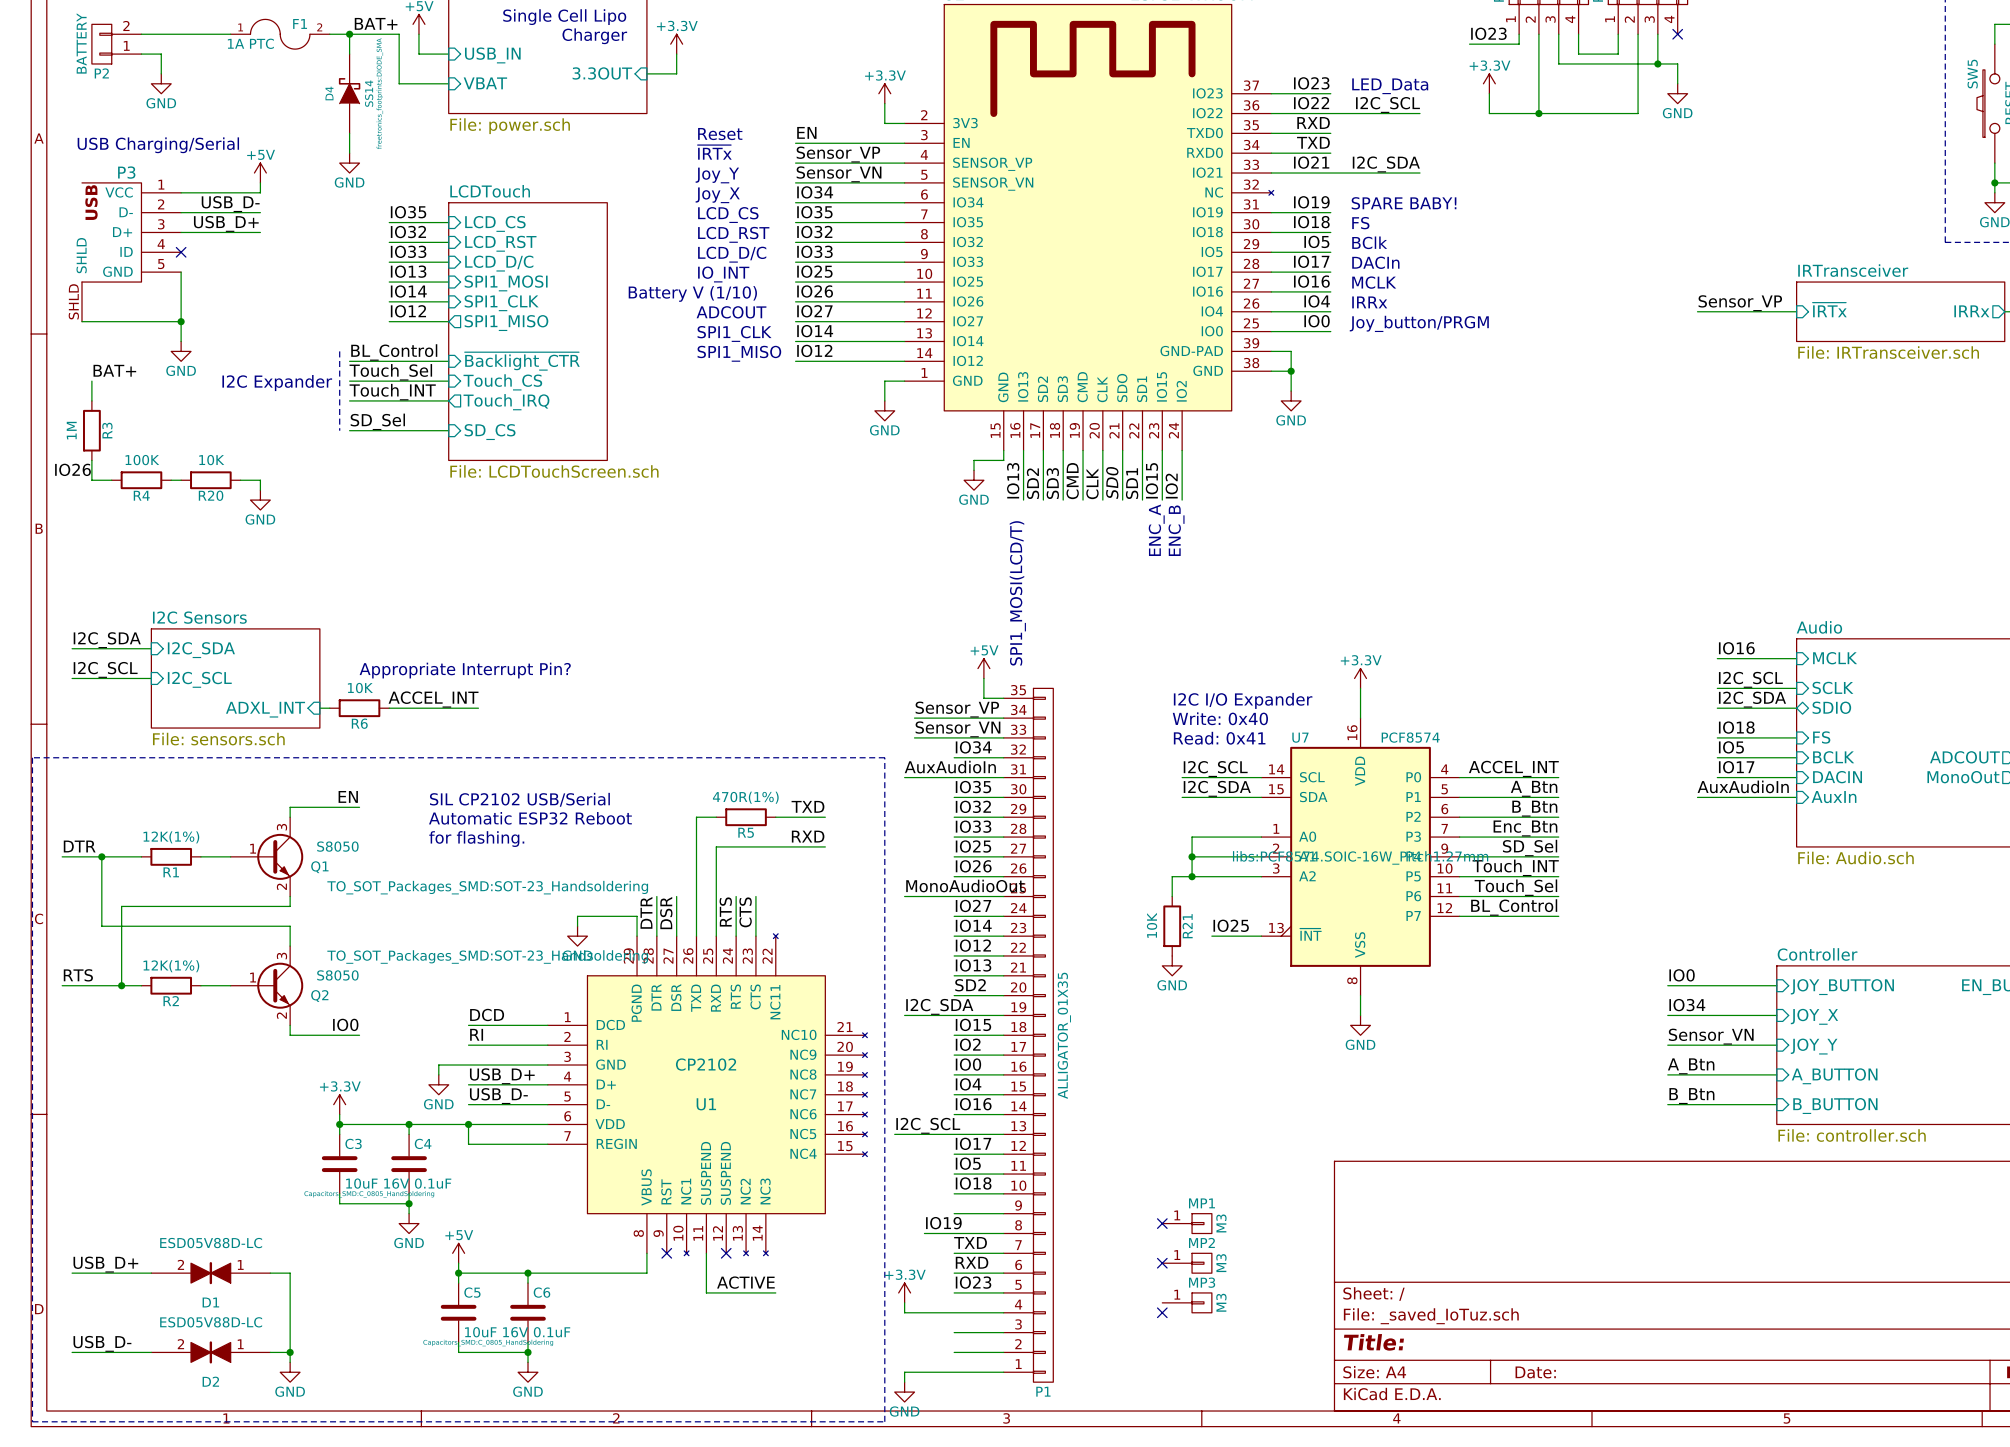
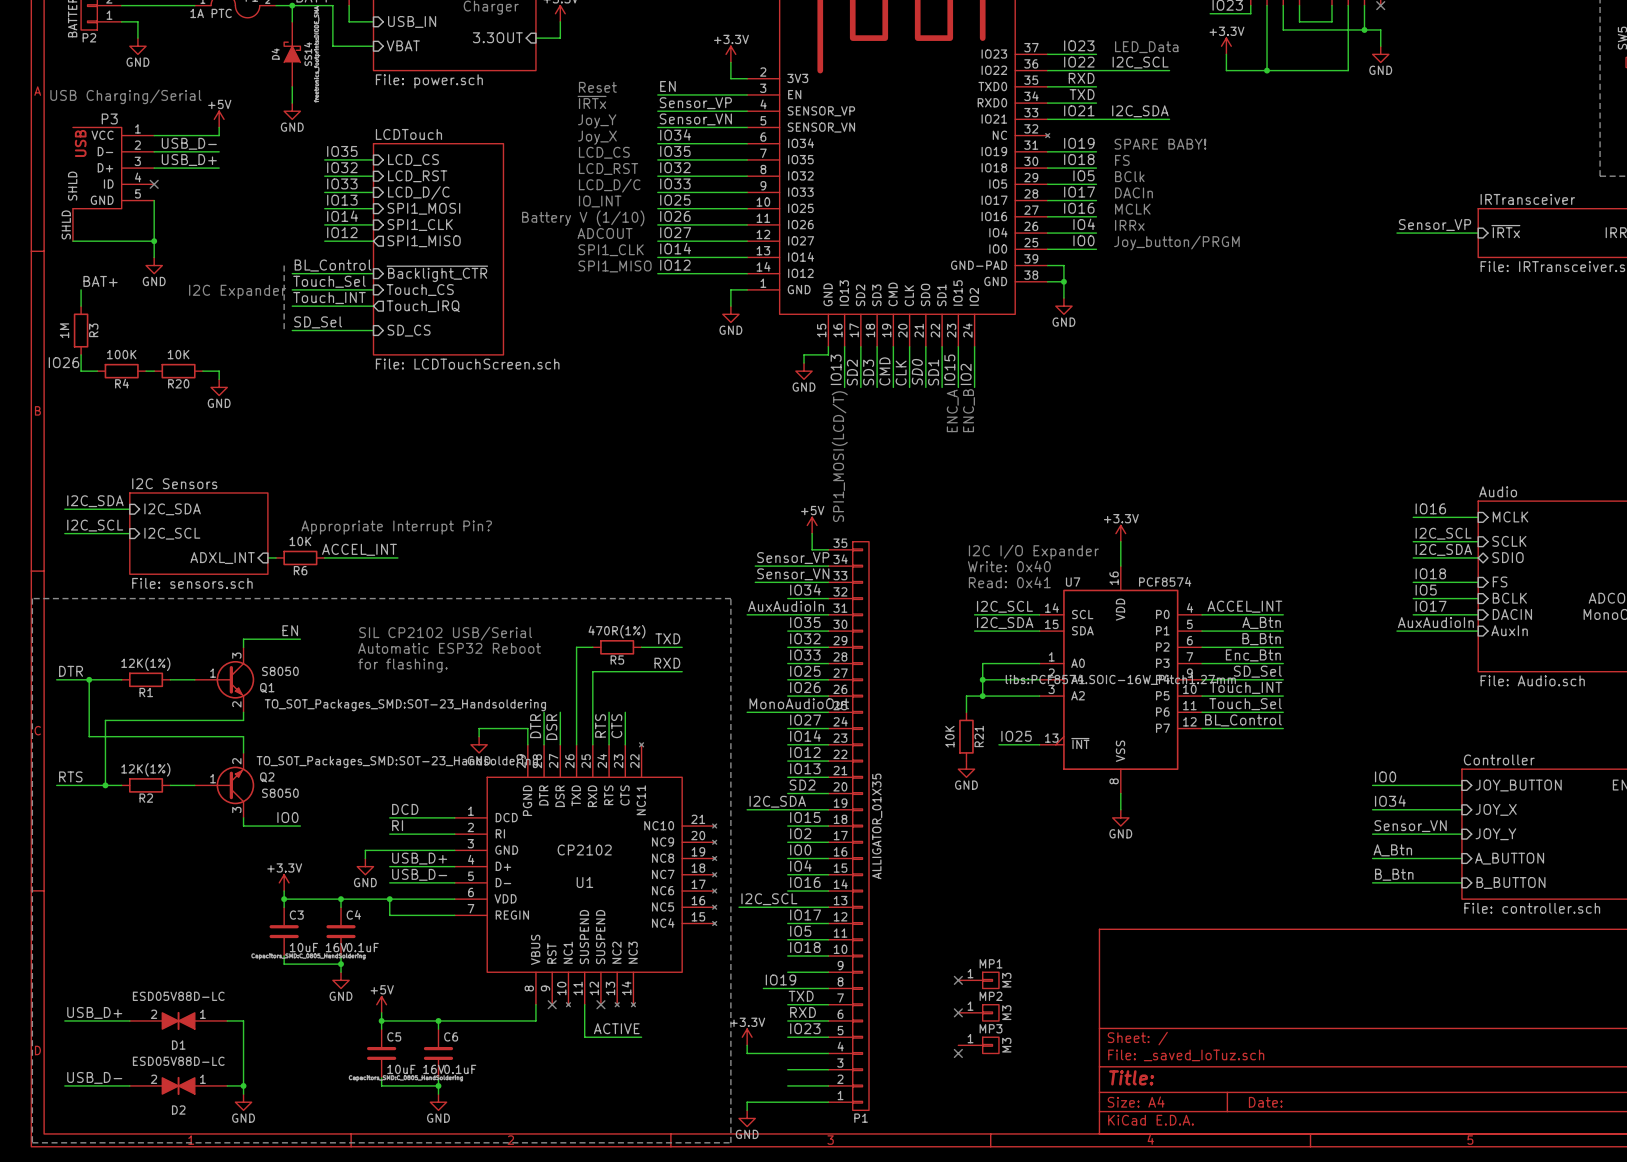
Q2 flip: as is (280, 985) -> up-down (235, 785)

